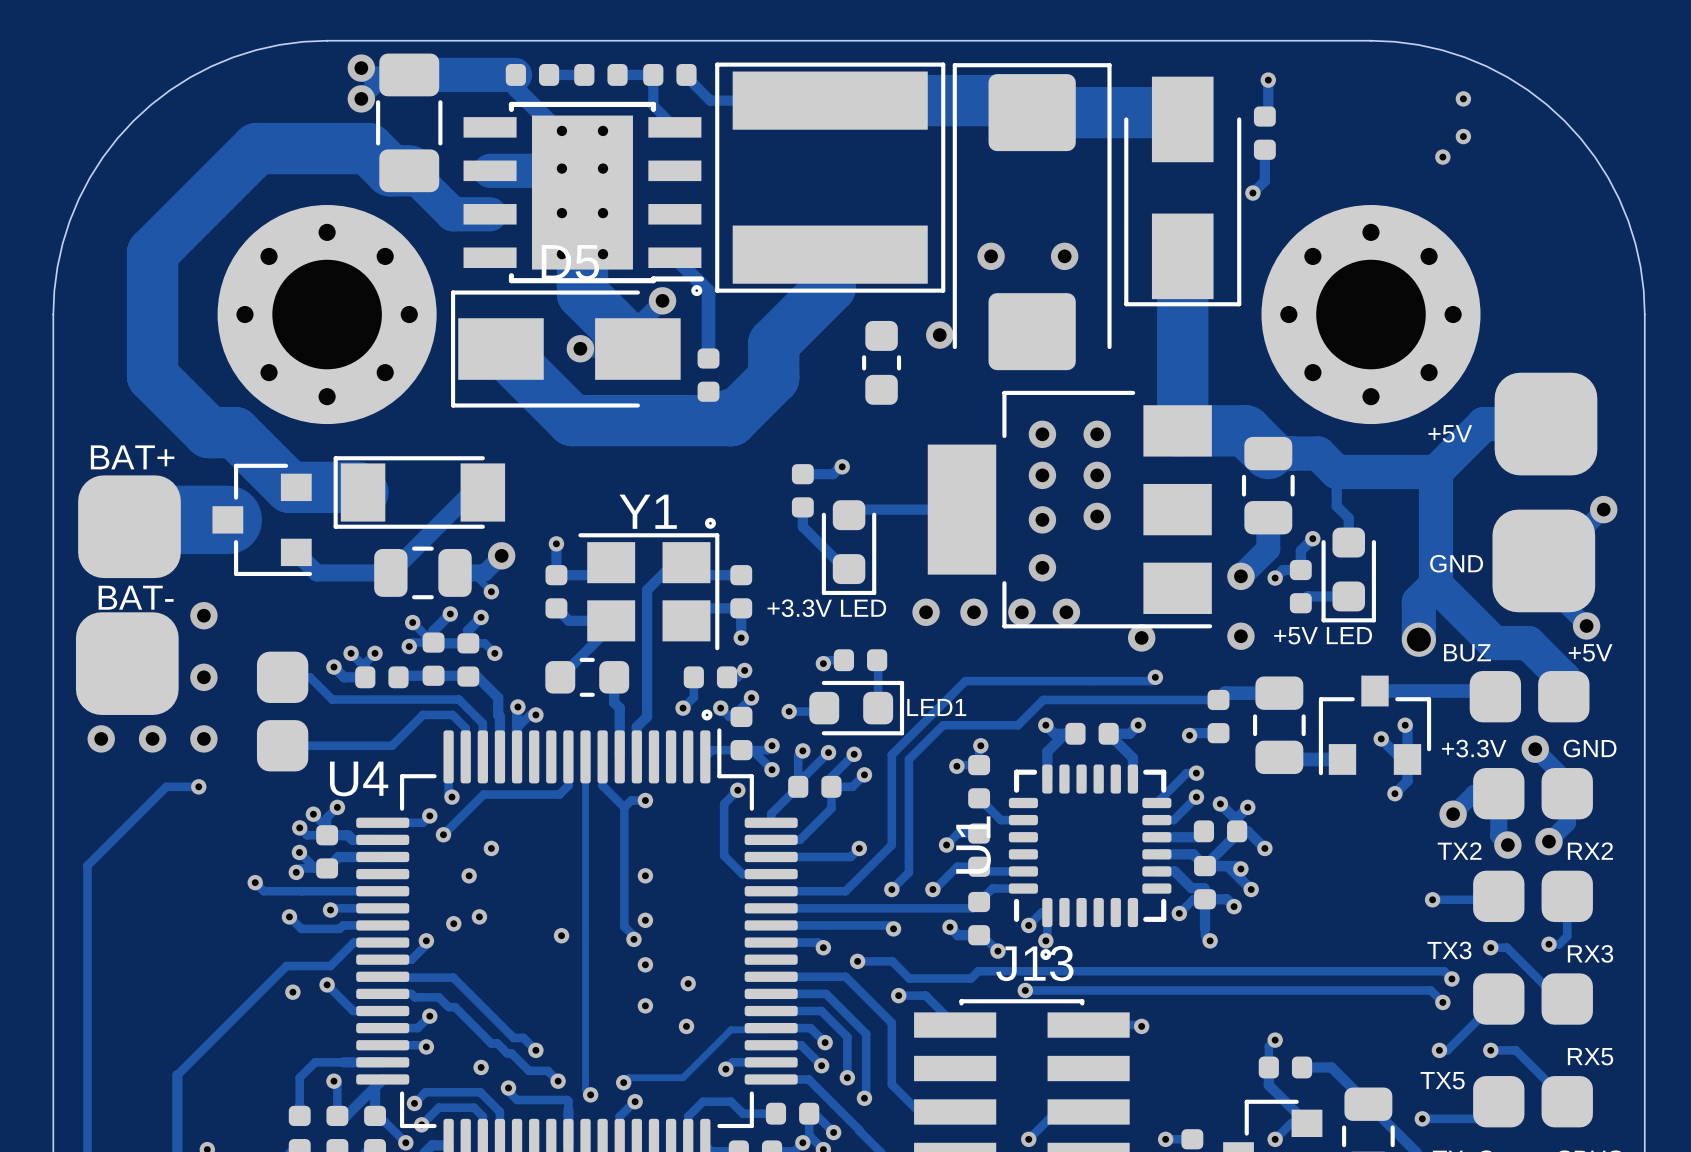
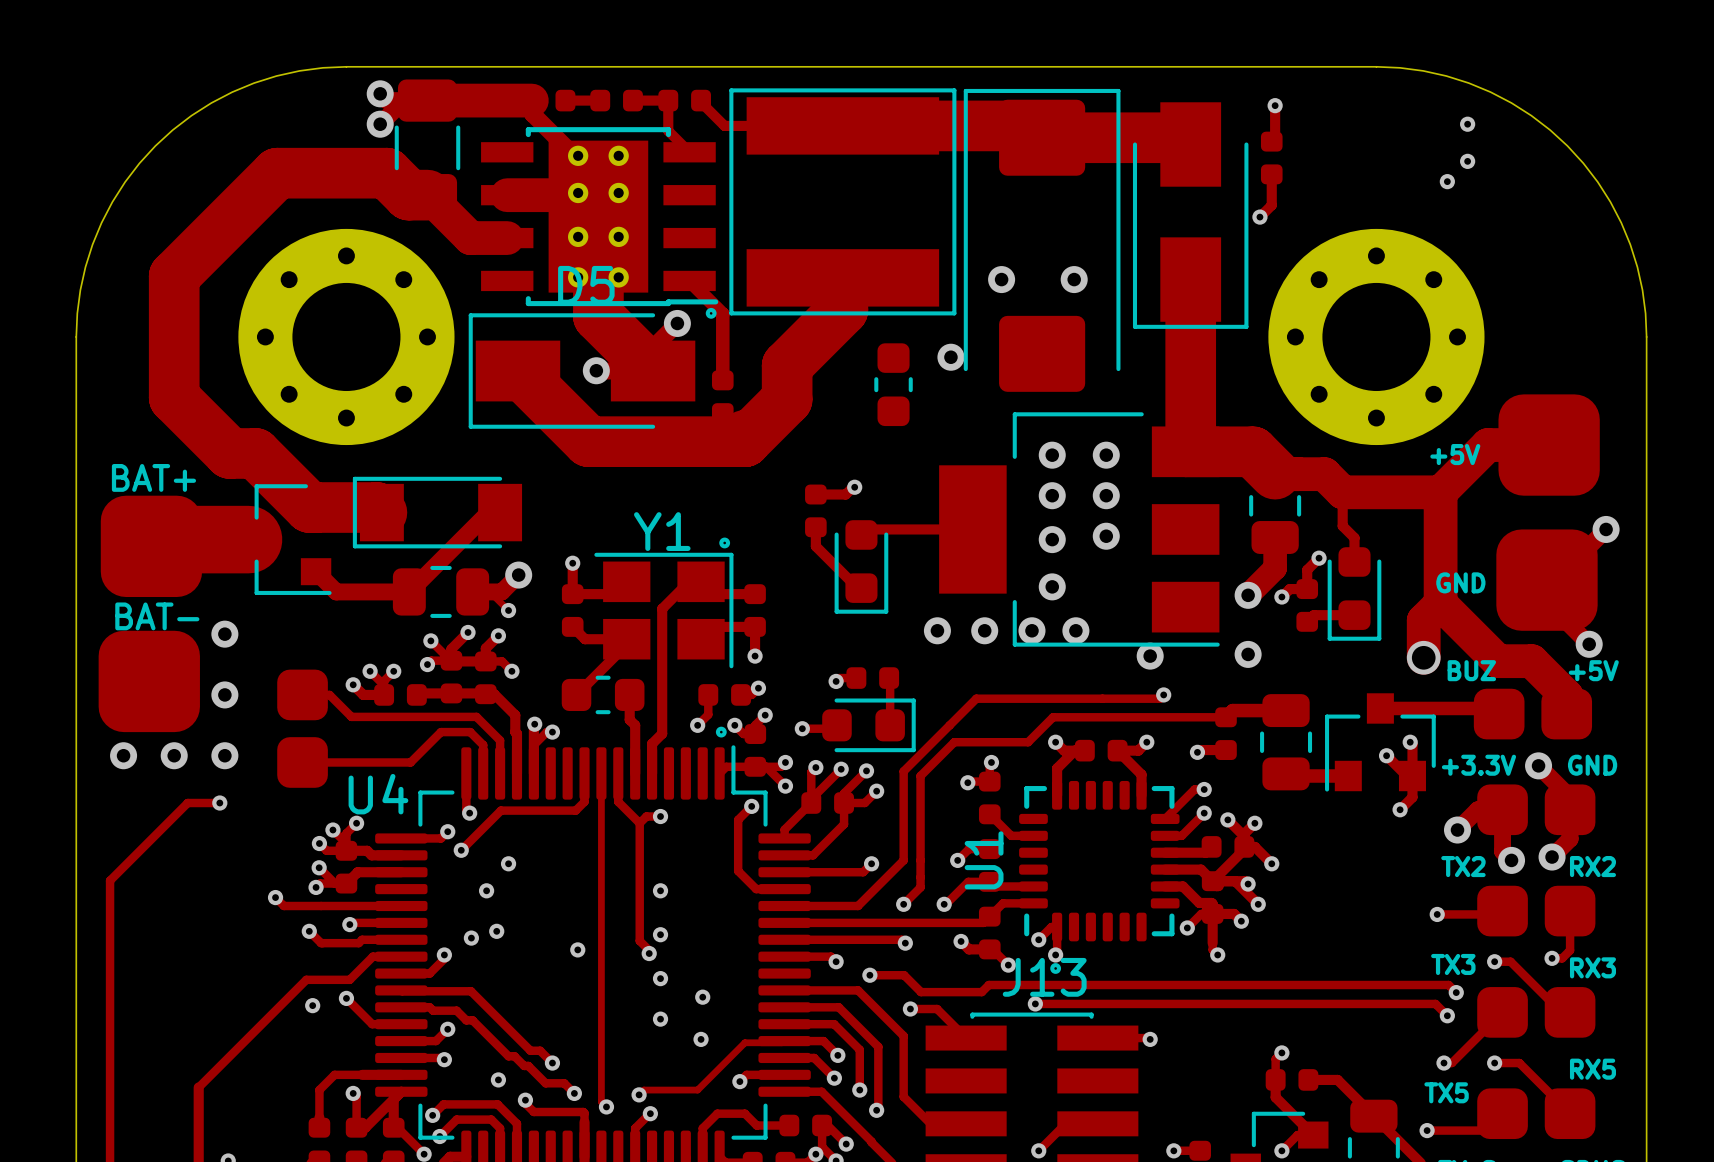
text: +3.3V LED (826, 608) -> none
text: +5V LED (1323, 635) -> none
text: LED1 (936, 707) -> none

